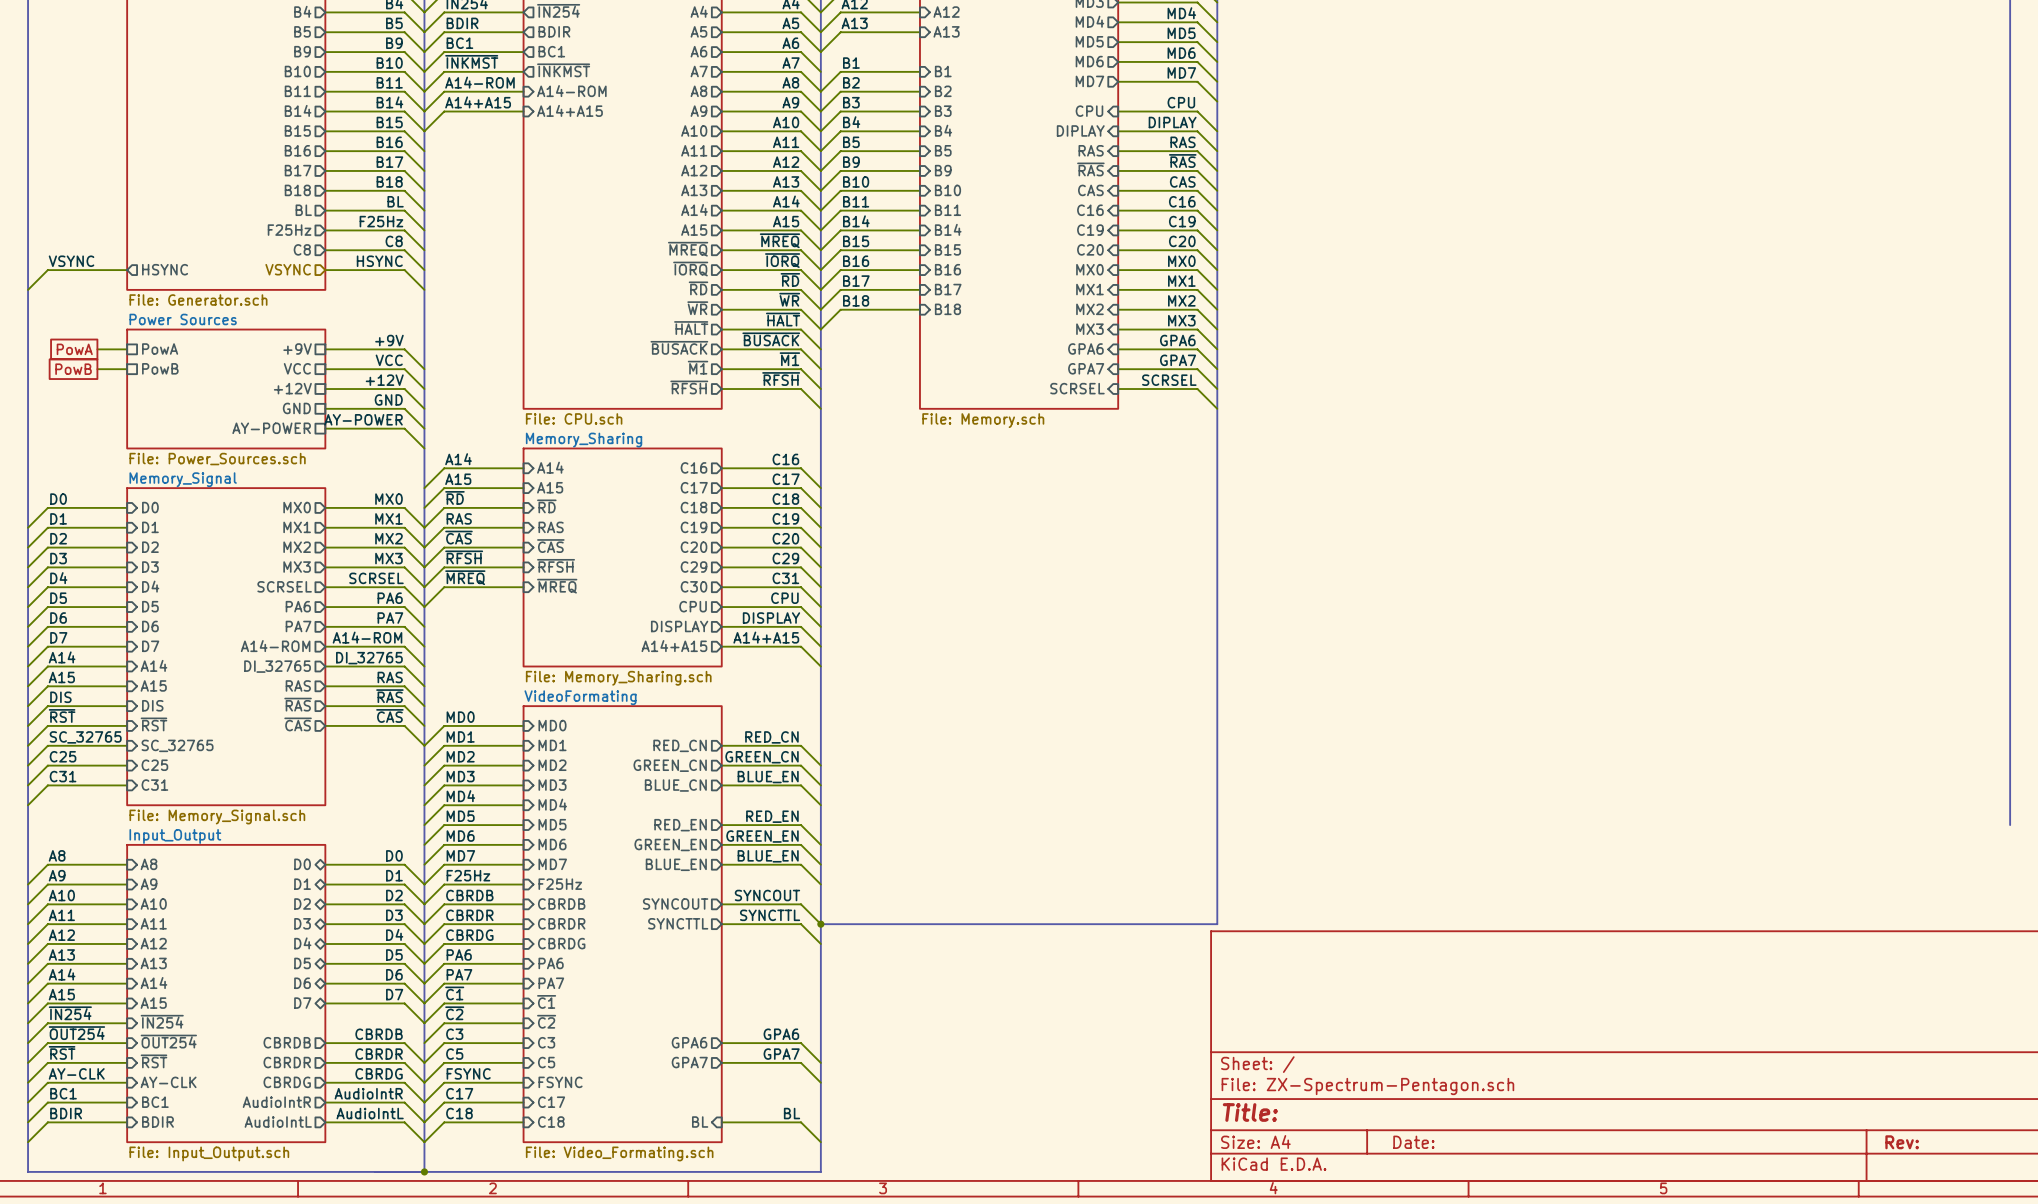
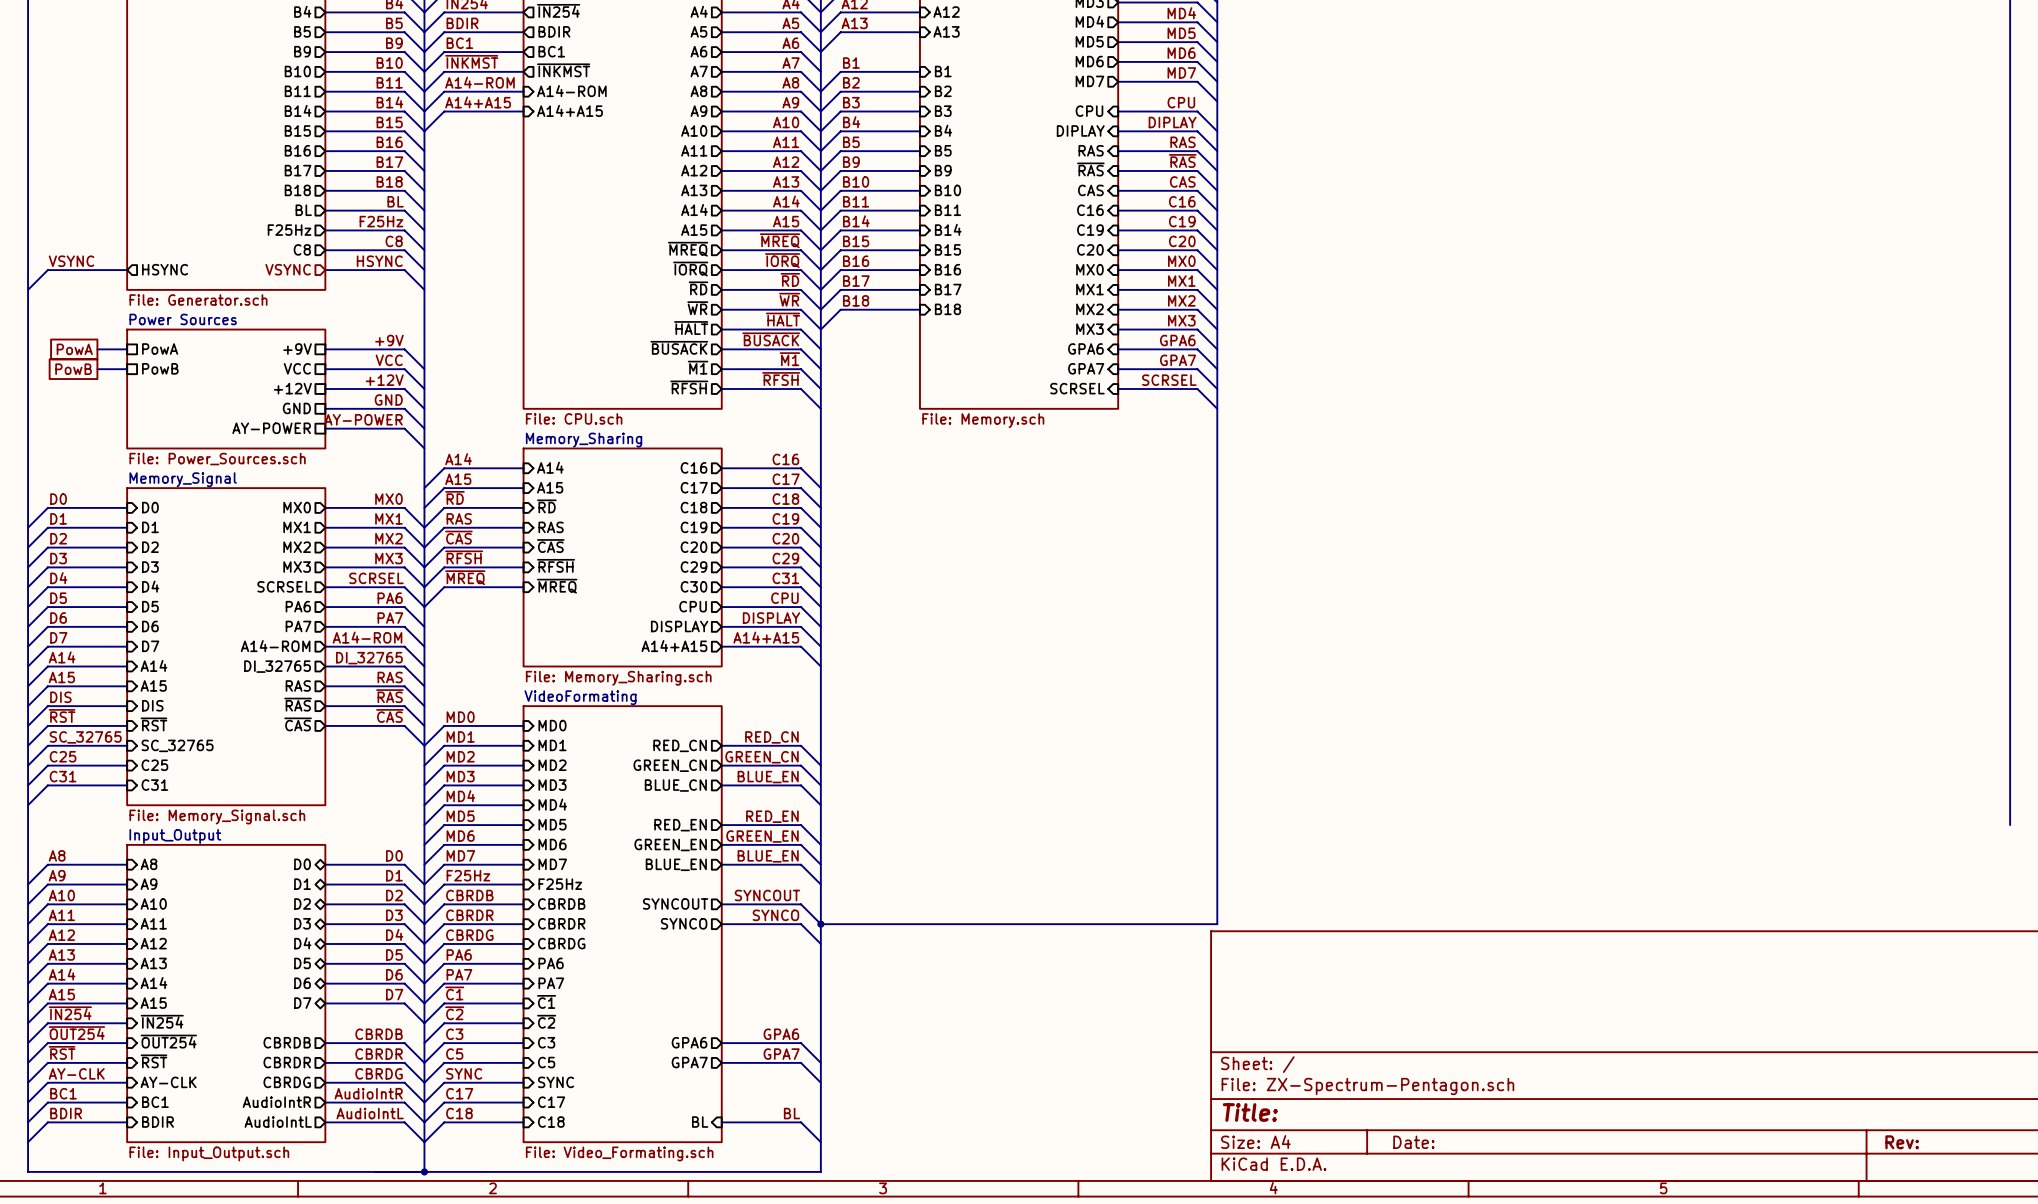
label: SYNCTTL (770, 915) -> SYNCO (775, 915)
sheet pin: SYNCTTL (678, 923) -> SYNCO (684, 923)
label: FSYNC (468, 1073) -> SYNC (464, 1073)
sheet pin: FSYNC (560, 1082) -> SYNC (556, 1082)

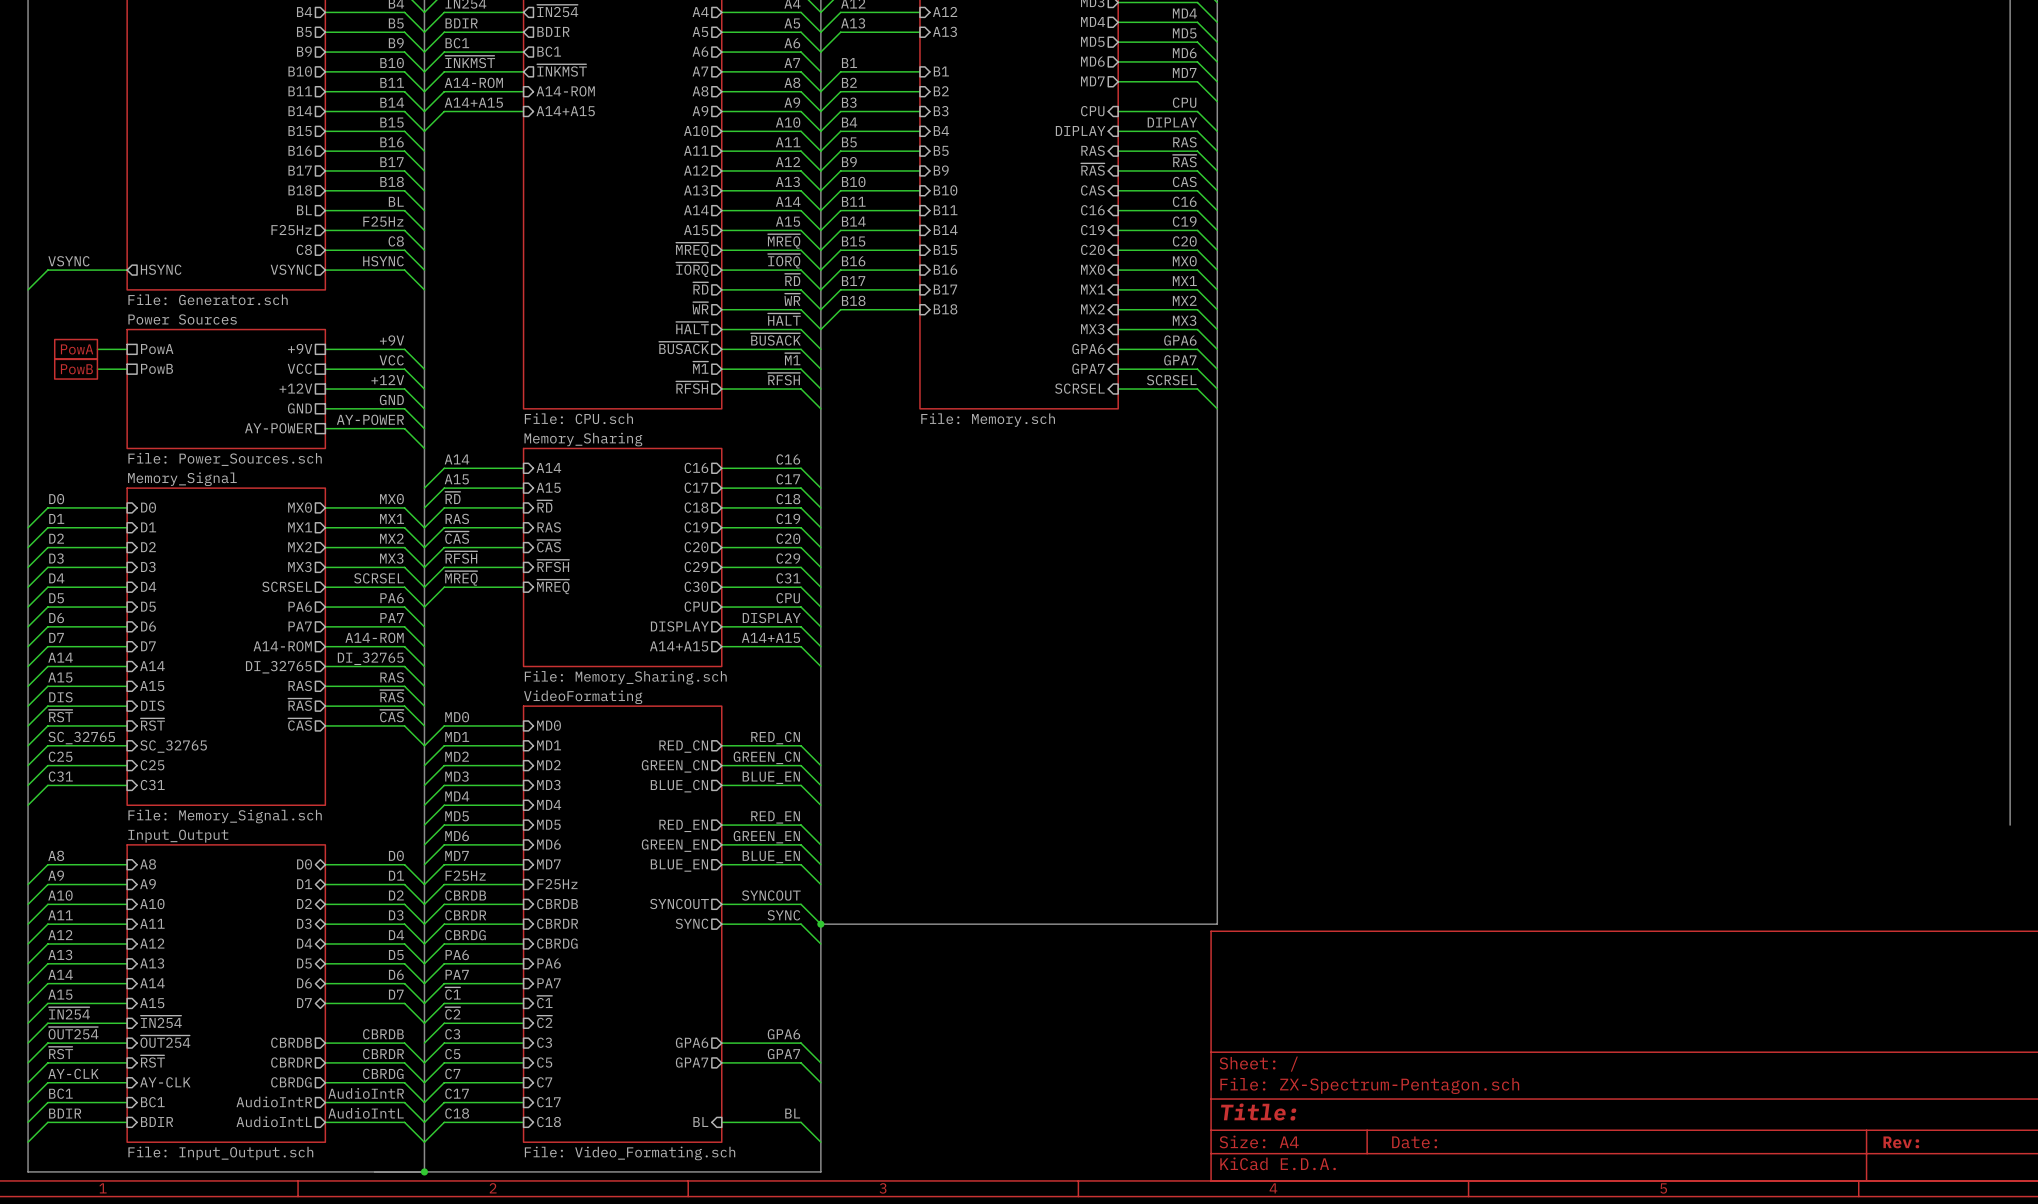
label: SYNCO (775, 915) -> SYNC (783, 915)
sheet pin: SYNCO (684, 923) -> SYNC (692, 923)
label: SYNC (464, 1073) -> C7 (452, 1073)
sheet pin: SYNC (556, 1082) -> C7 (544, 1082)

